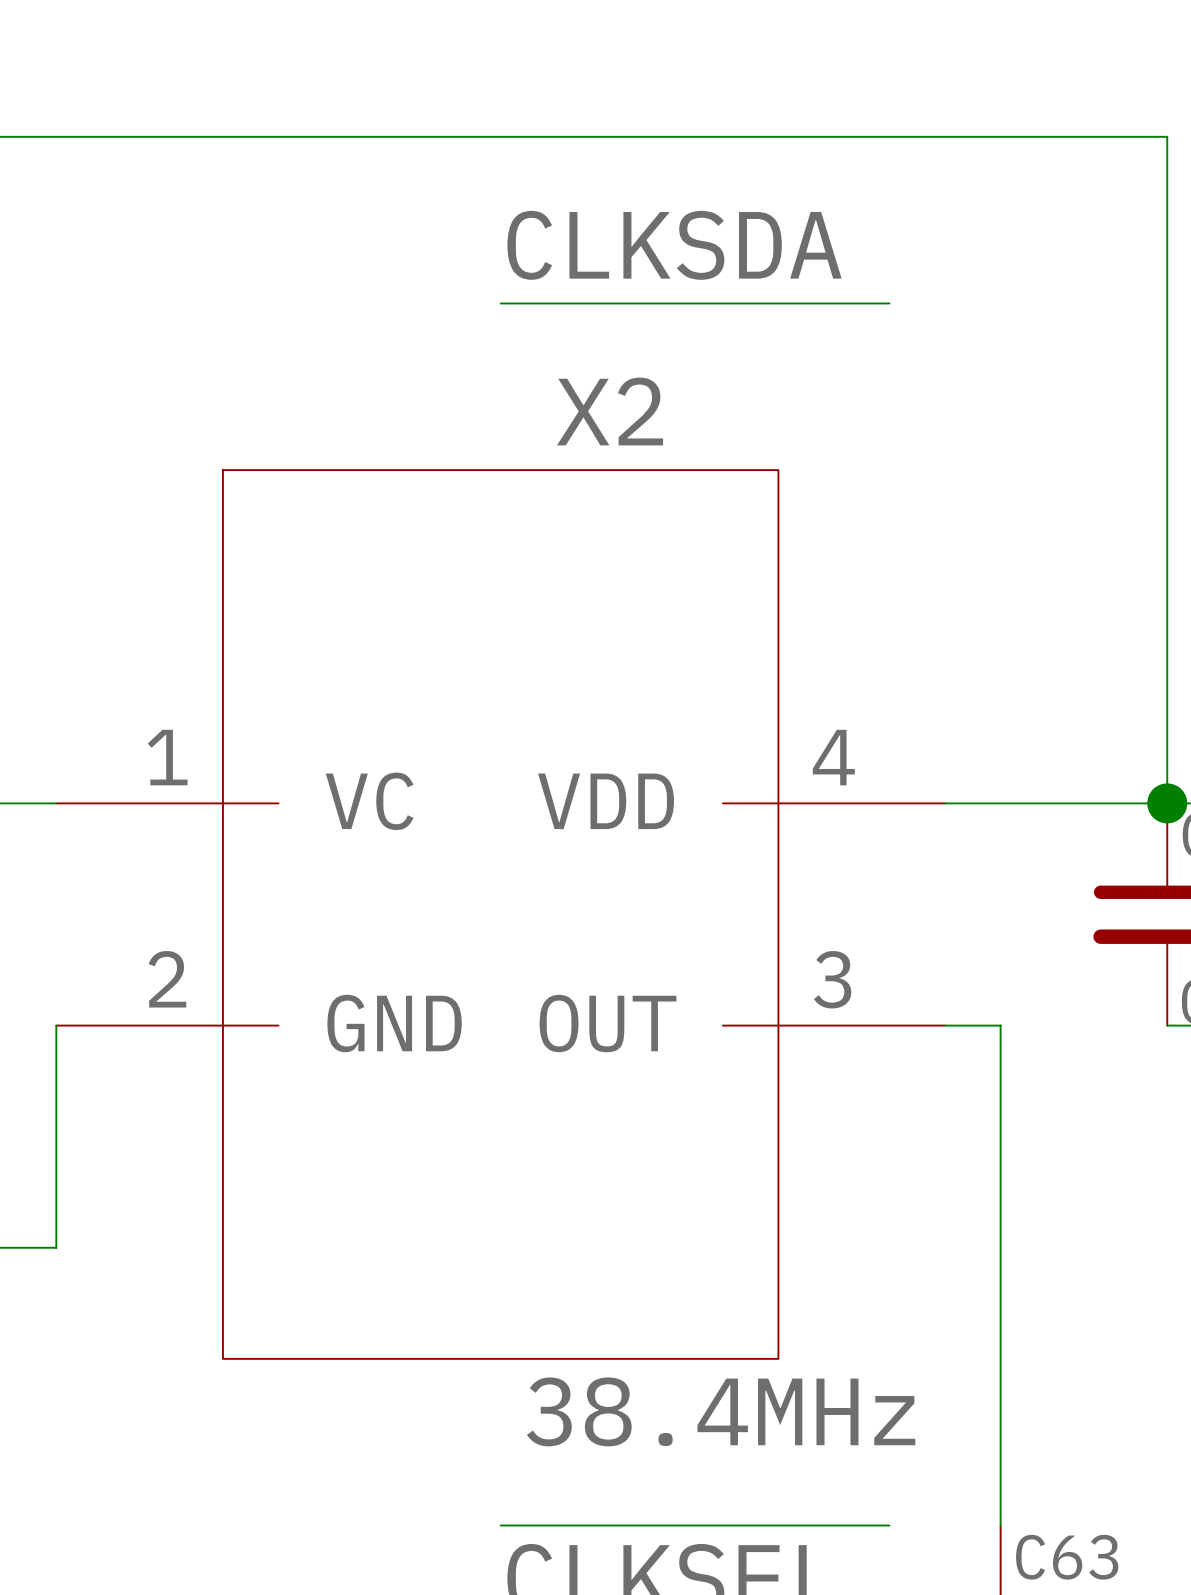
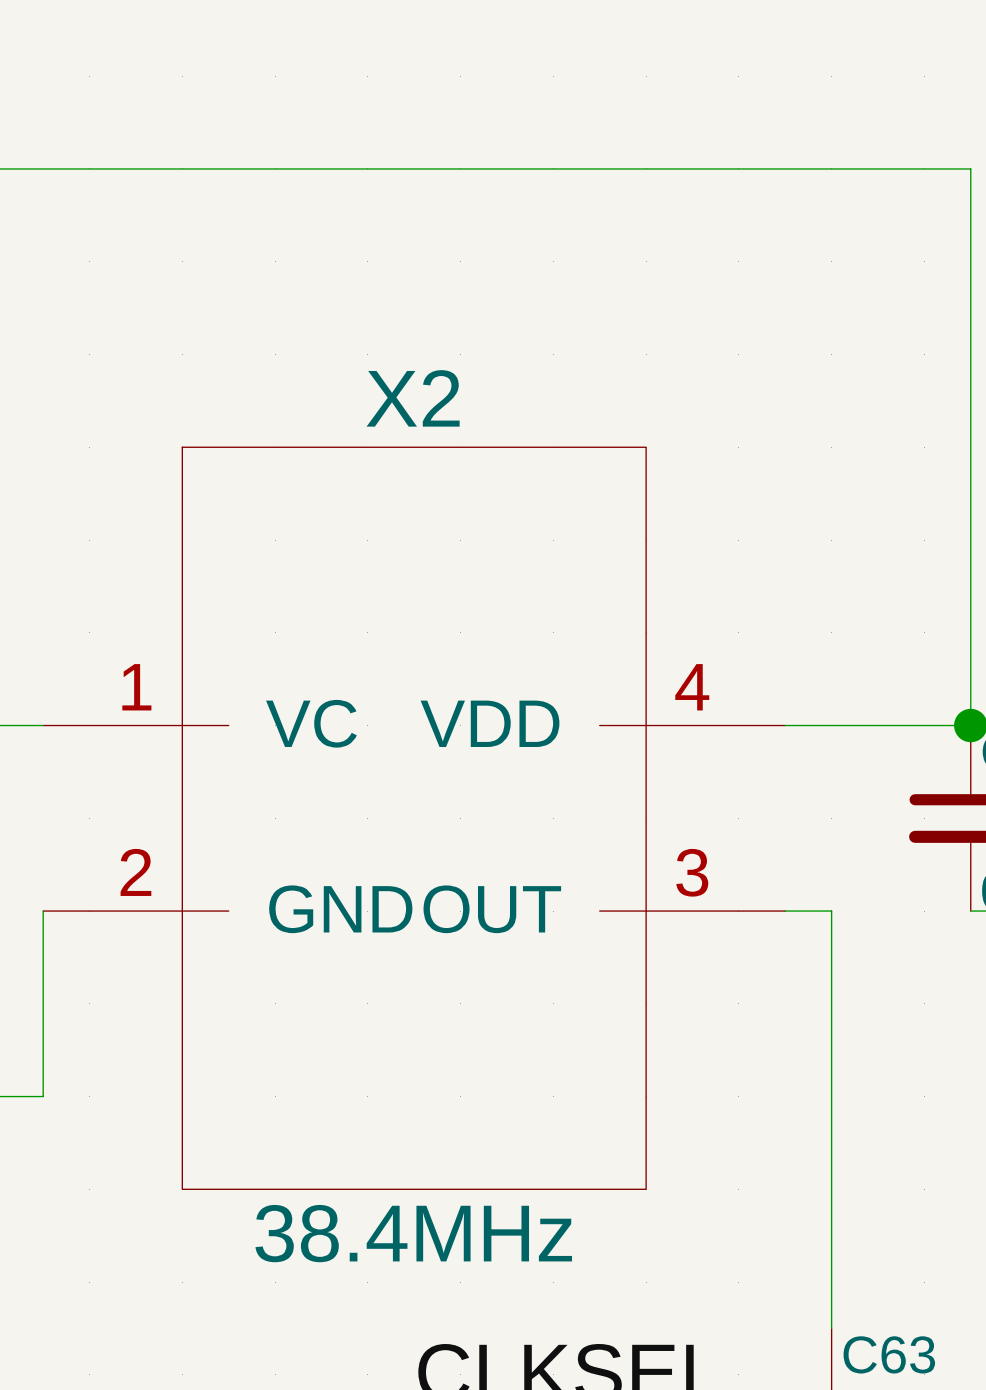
label: CLKSDA (674, 245) -> none
wire: (500, 303) (889, 303) -> none
X2 name position: X2 (610, 411) -> X2 (413, 398)
X2 value position: 38.4MHz (721, 1411) -> 38.4MHz (413, 1233)
wire: (500, 1525) (889, 1525) -> none

